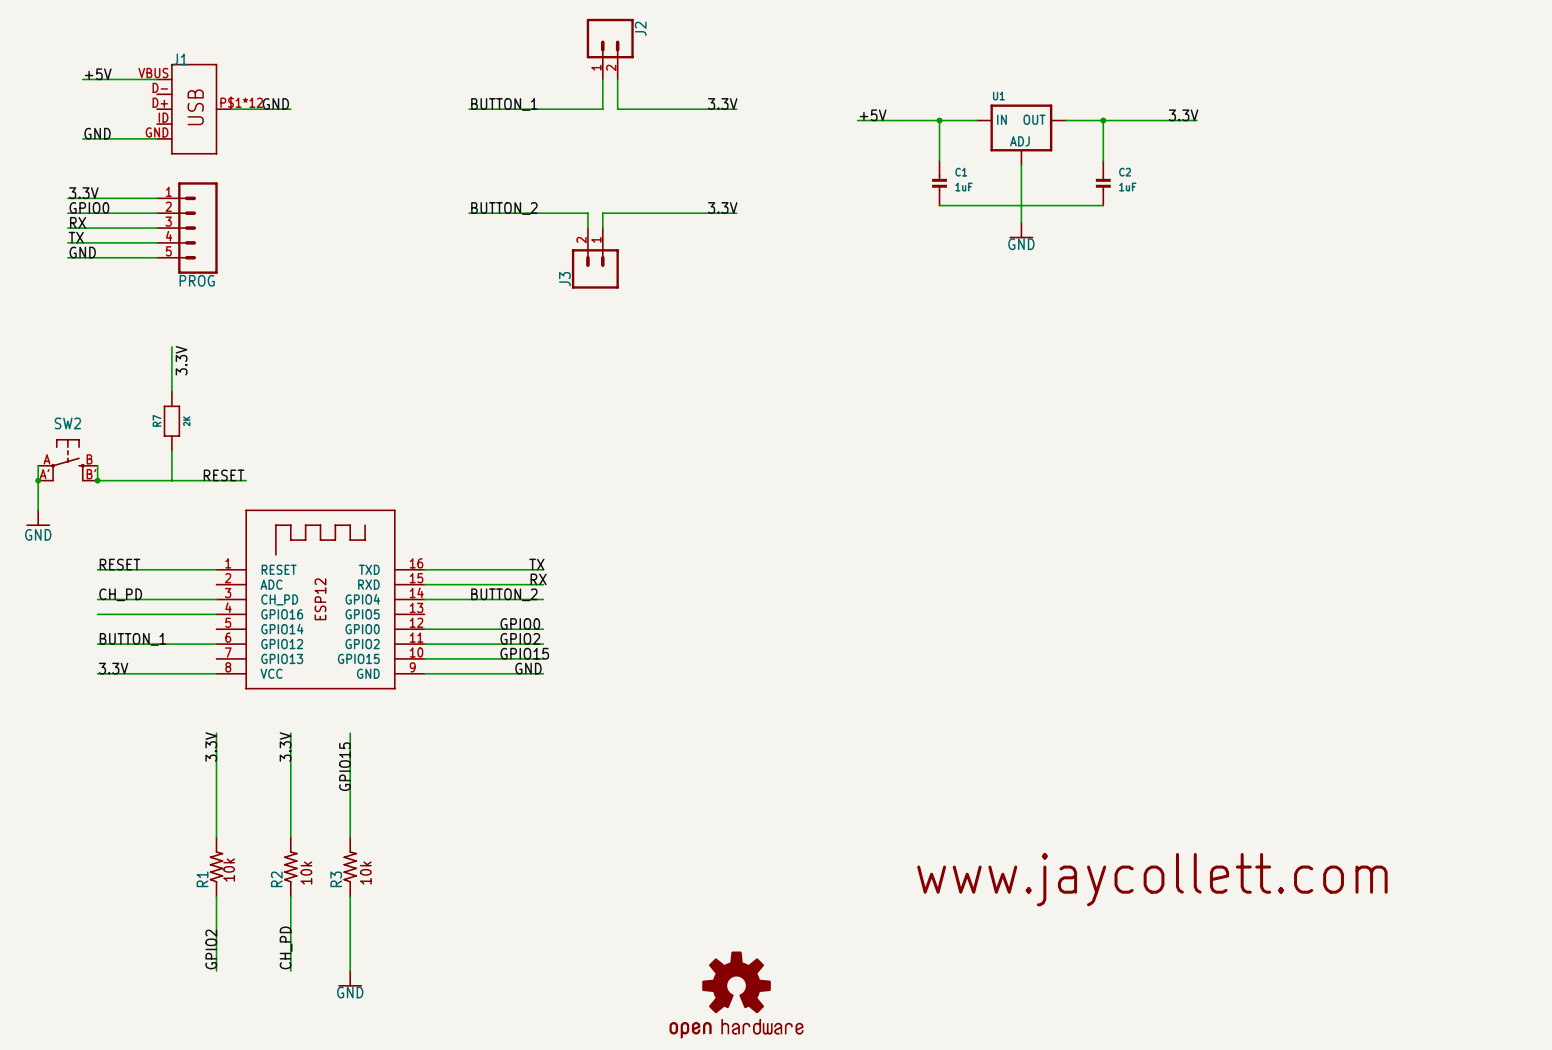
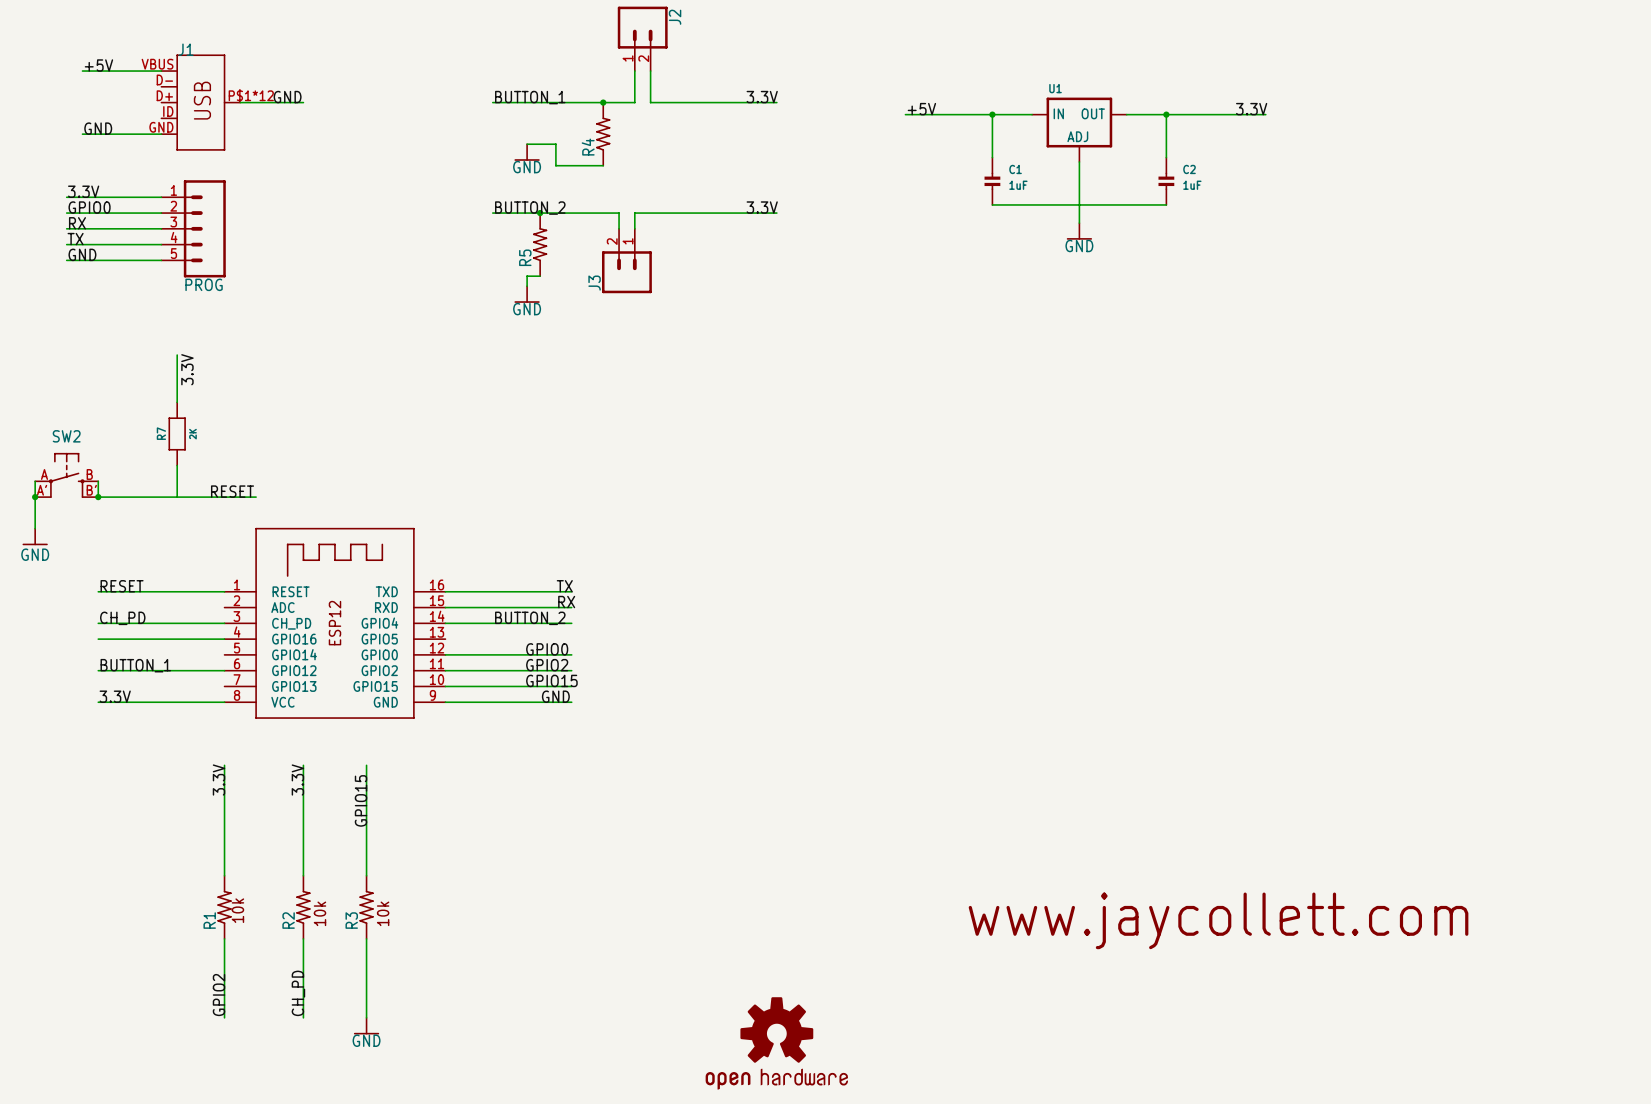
junction: none -> (603, 102)
R4: none -> (603, 134)
wire: none -> (527, 144) (555, 144) (555, 165) (603, 165)
power symbol: none -> GND (527, 152)
junction: none -> (540, 213)
R5: none -> (540, 244)
wire: none -> (540, 276) (527, 276) (527, 286)
power symbol: none -> GND (527, 294)

